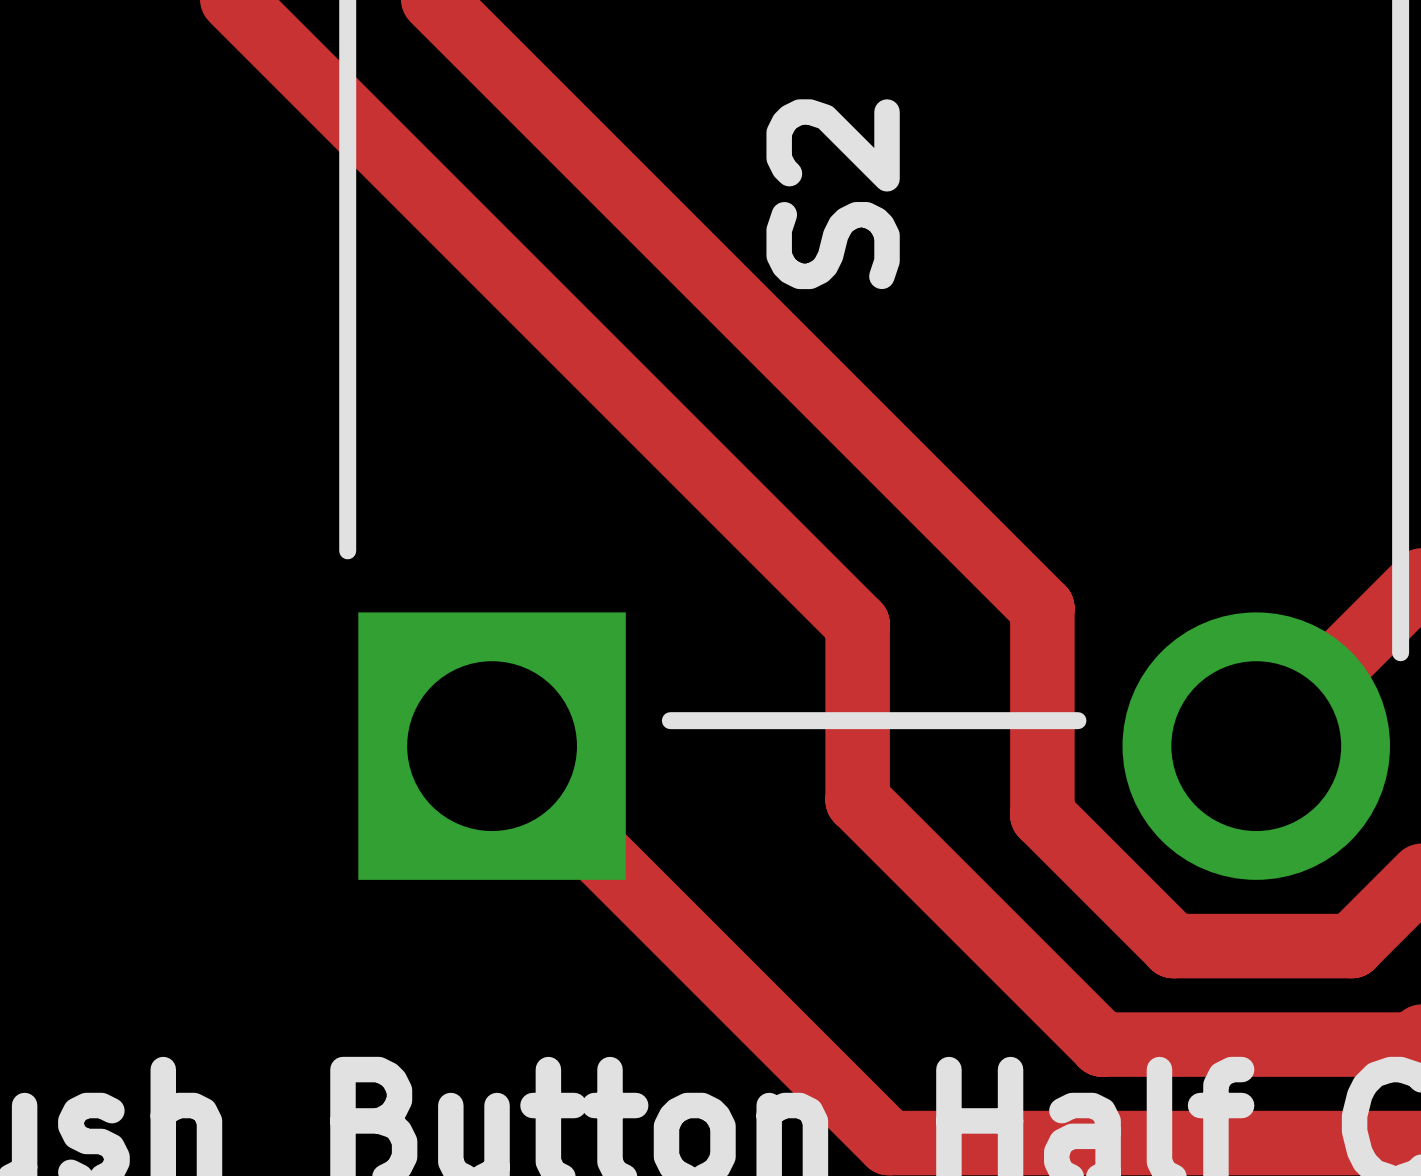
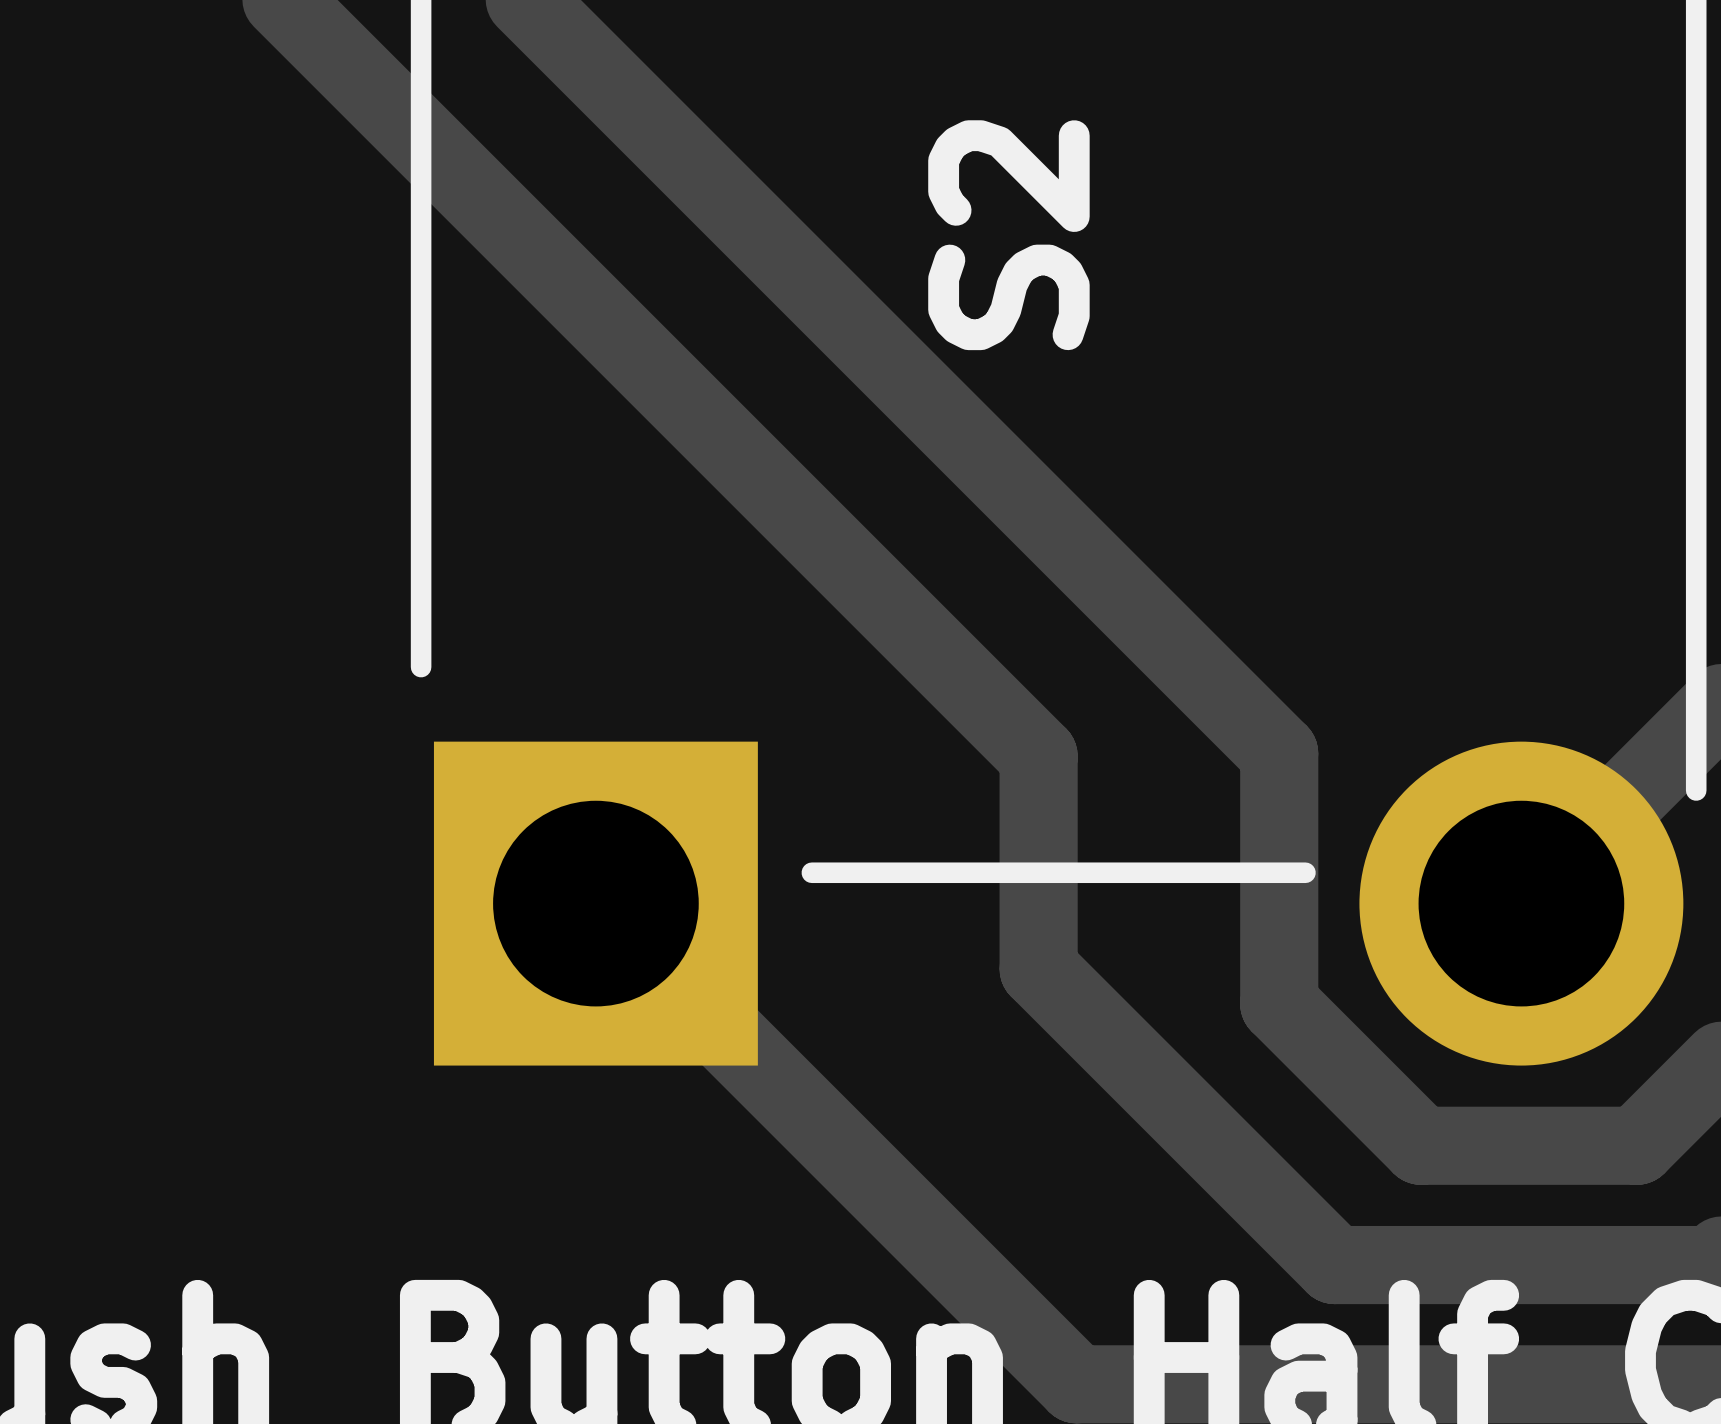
track: (1042, 608) (1042, 815) (1056, 828) -> (1262, 736) (1279, 753) (1279, 1003)

